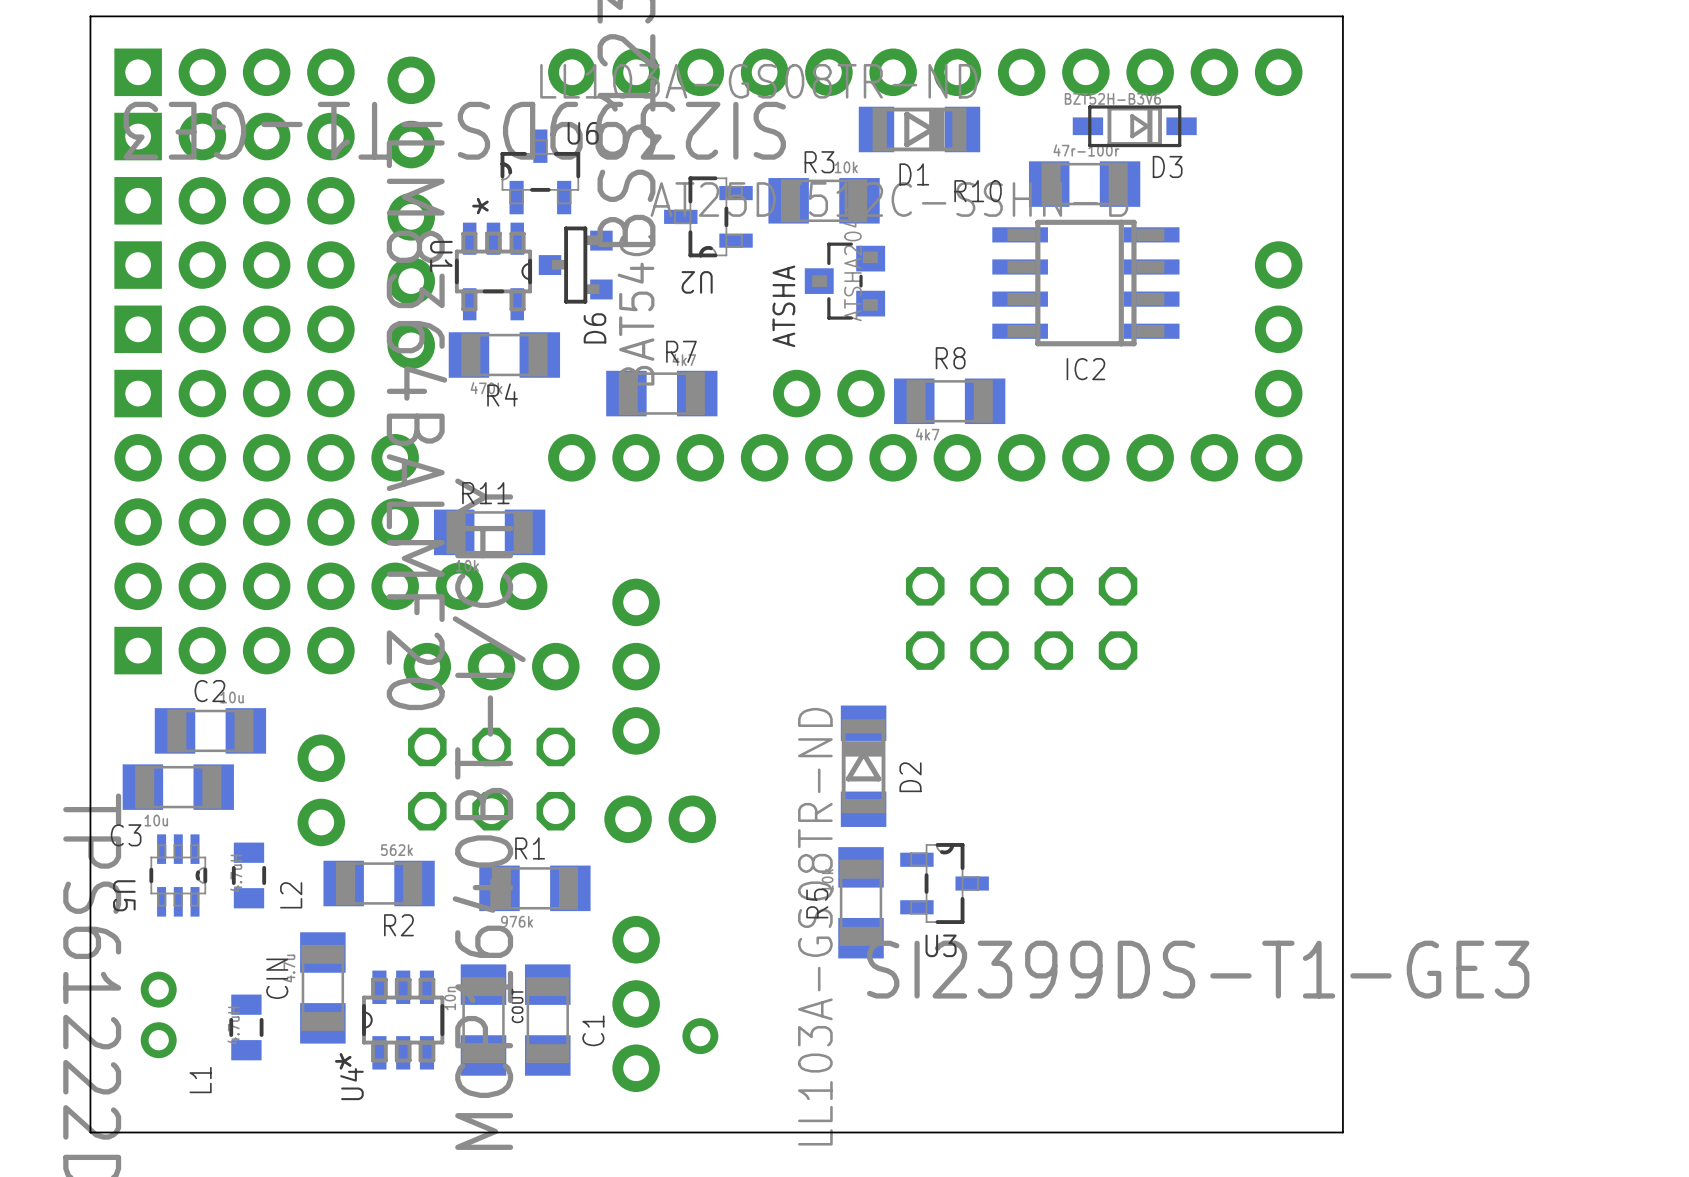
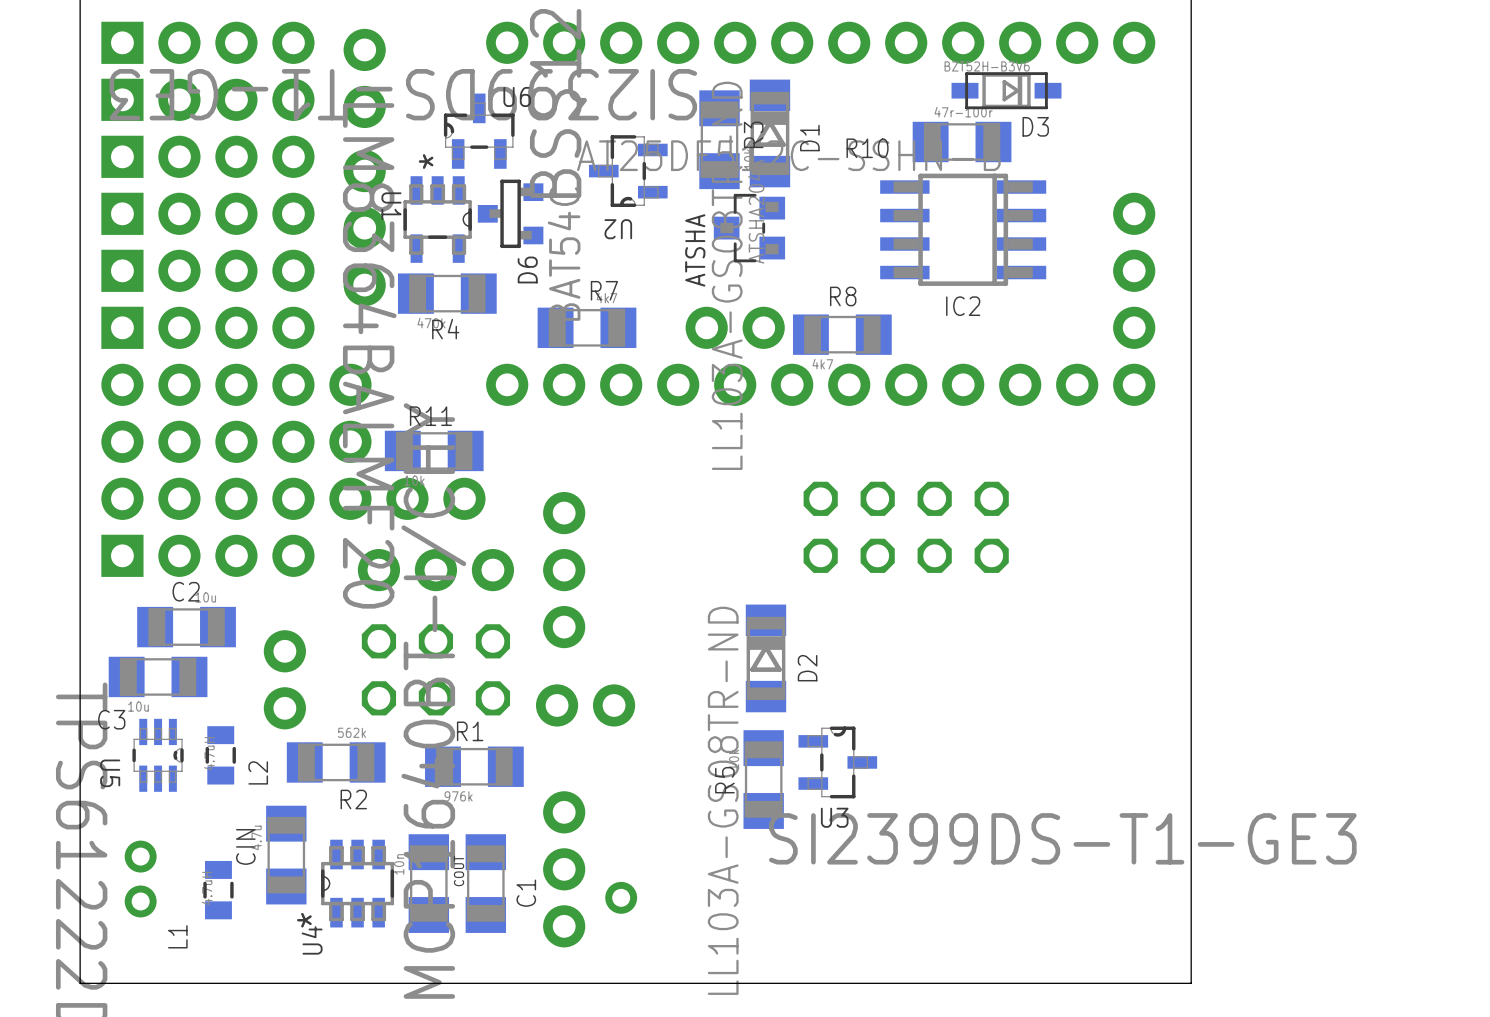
D1 rotation: 0° (919, 129) -> 90° counterclockwise (769, 133)
R3 rotation: 0° (824, 200) -> 90° clockwise (719, 139)

